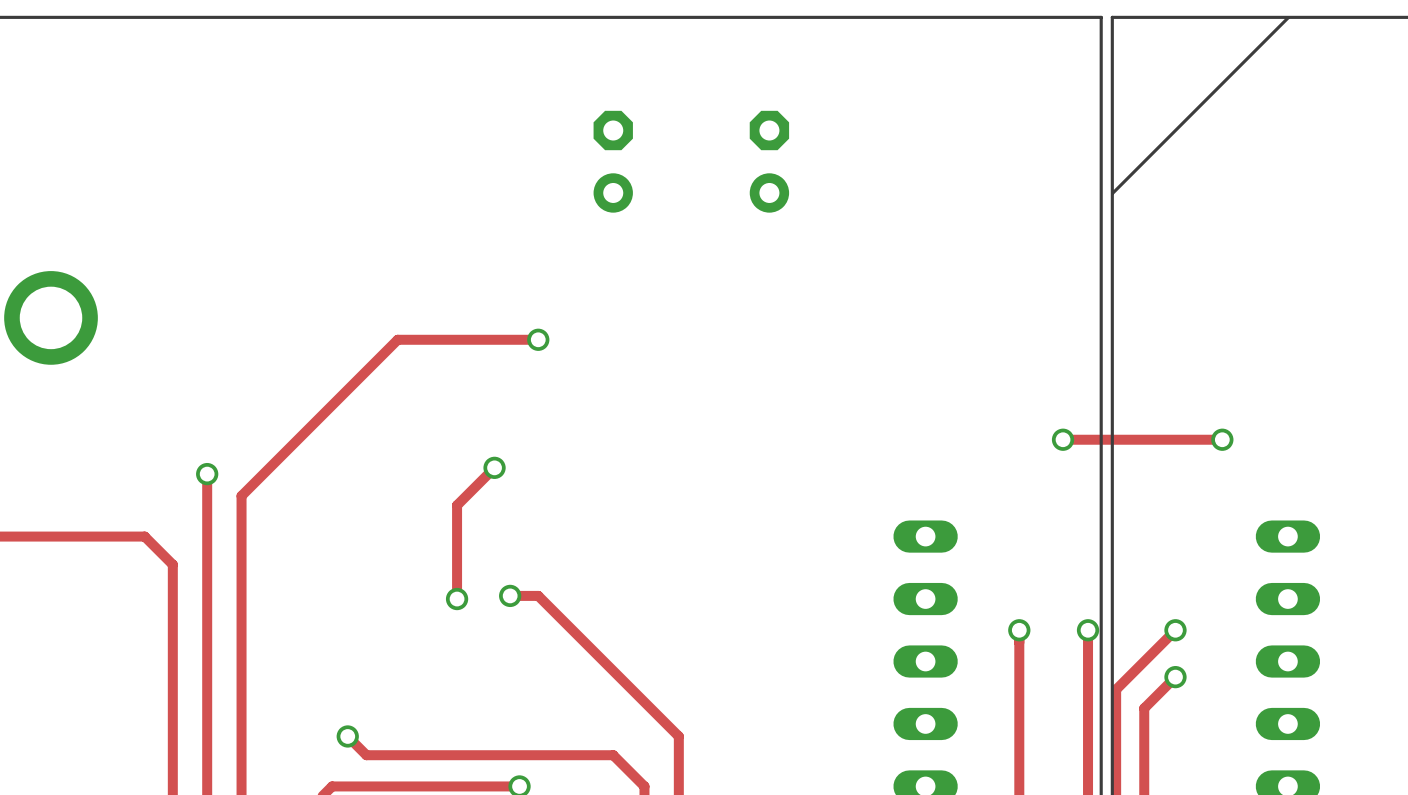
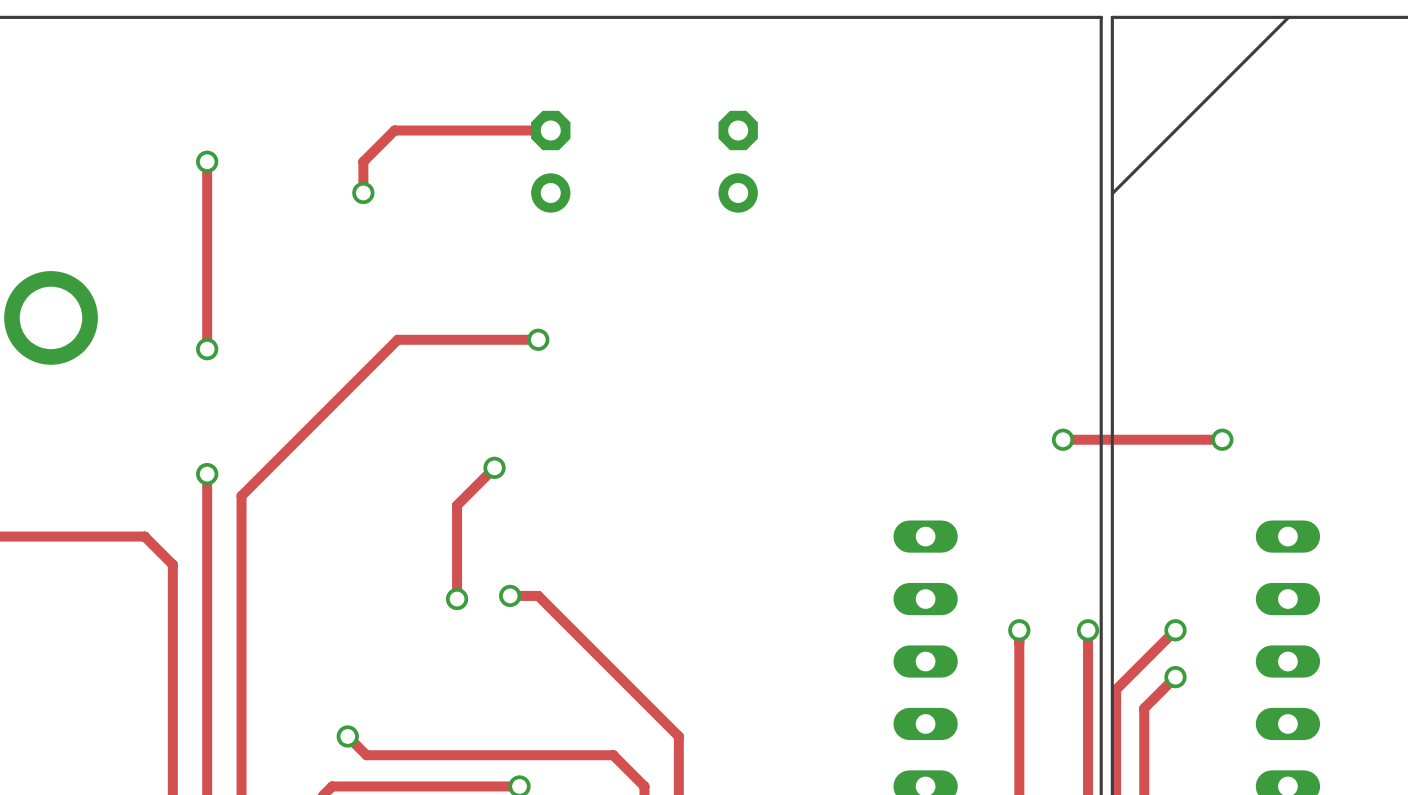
track: none -> (550, 130) (394, 130) (363, 161) (363, 192)
track: none -> (207, 161) (207, 349)
via: none -> (207, 161)
part: none -> (550, 161)
part: (613, 161) -> none
part position: (769, 161) -> (738, 161)
via: none -> (363, 192)
via: none -> (207, 349)

